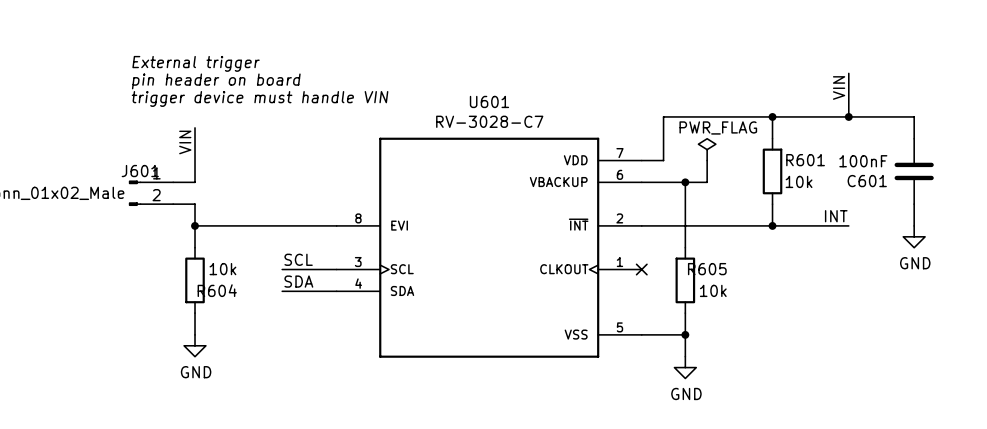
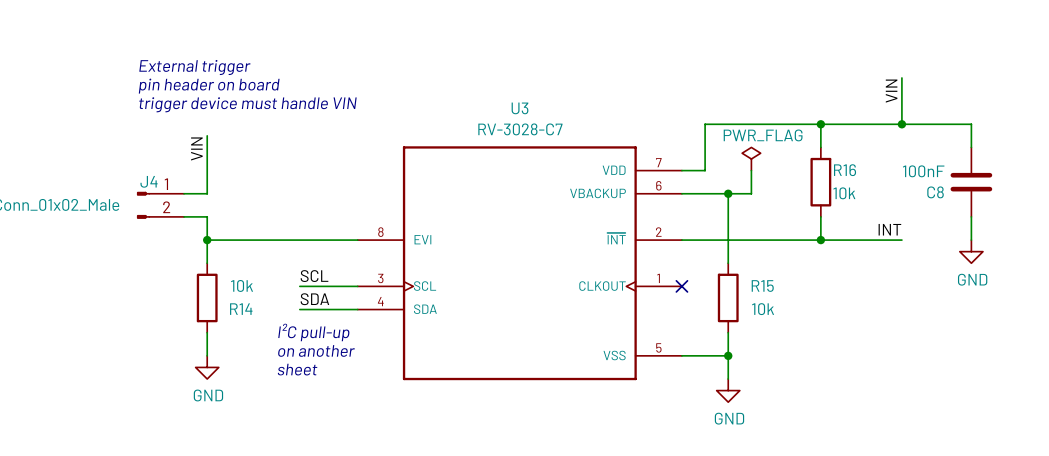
U601 name: U601 (489, 101) -> U3 (520, 108)
R601 name: R601 (805, 160) -> R16 (845, 170)
J601 name: J601 (140, 171) -> J4 (149, 181)
C601 name: C601 (867, 181) -> C8 (935, 192)
R605 name: R605 (707, 269) -> R15 (762, 286)
R604 name: R604 (217, 290) -> R14 (241, 309)
text: none -> I²C pull-up (313, 332)
text: none -> on another (316, 350)
text: none -> sheet (297, 369)

